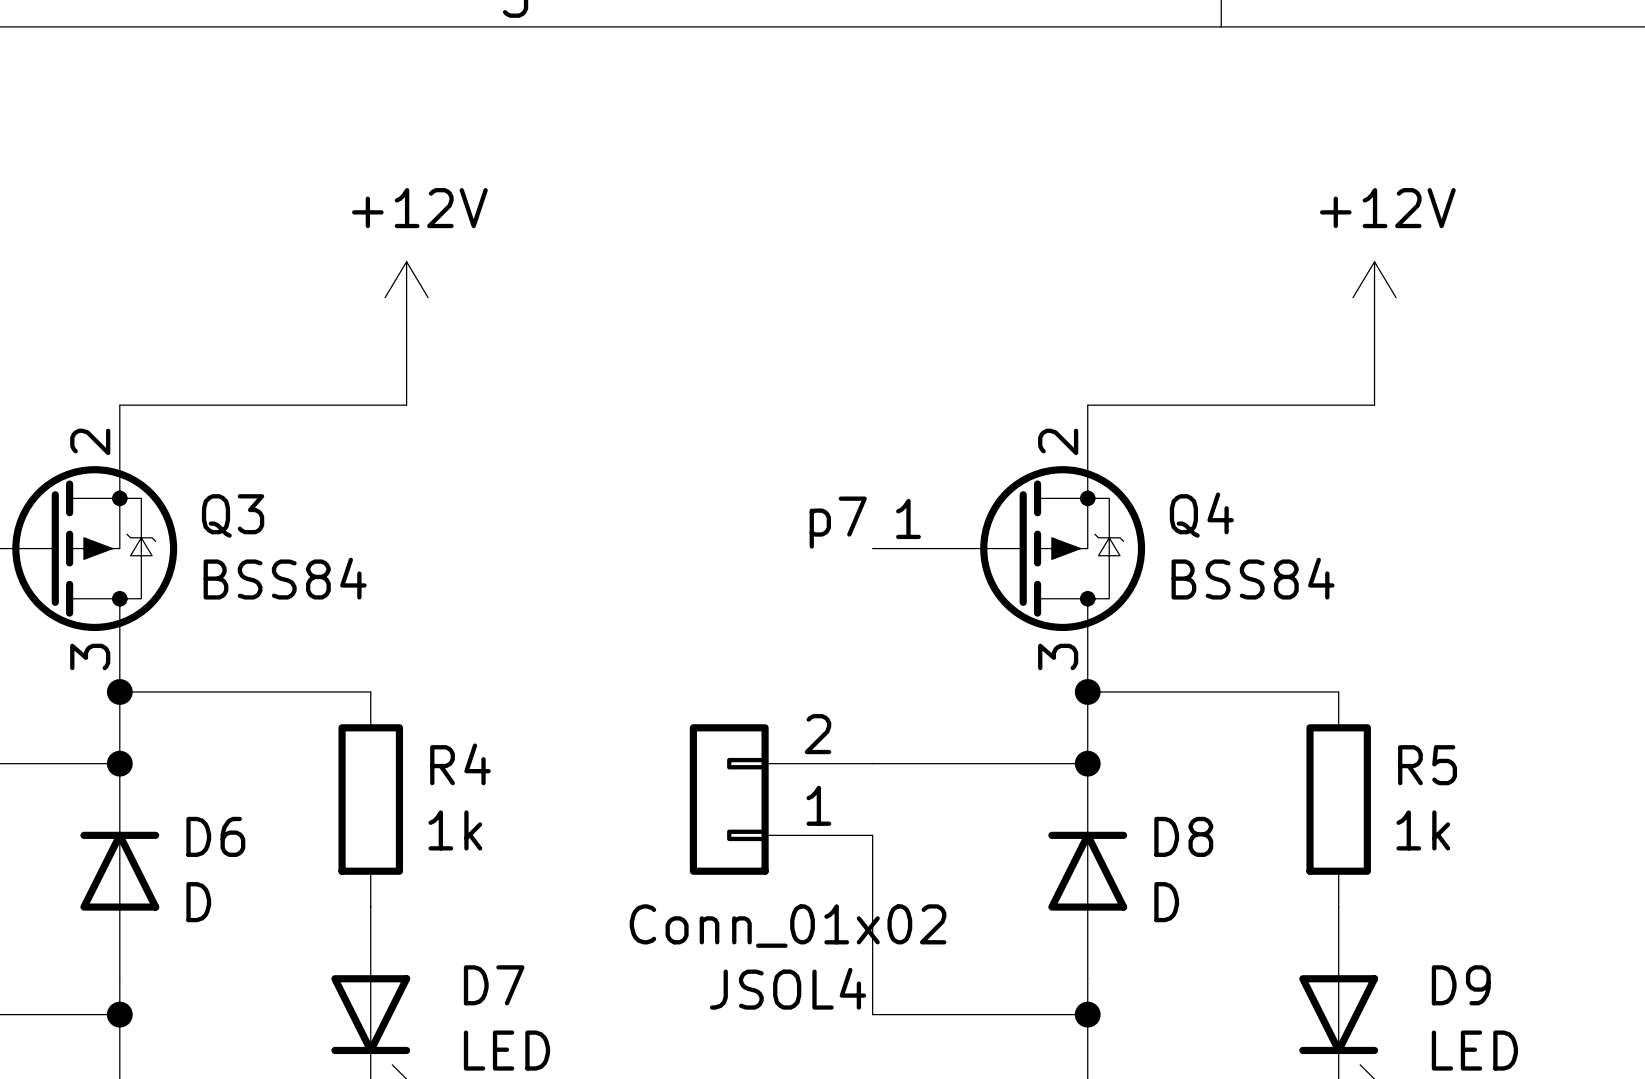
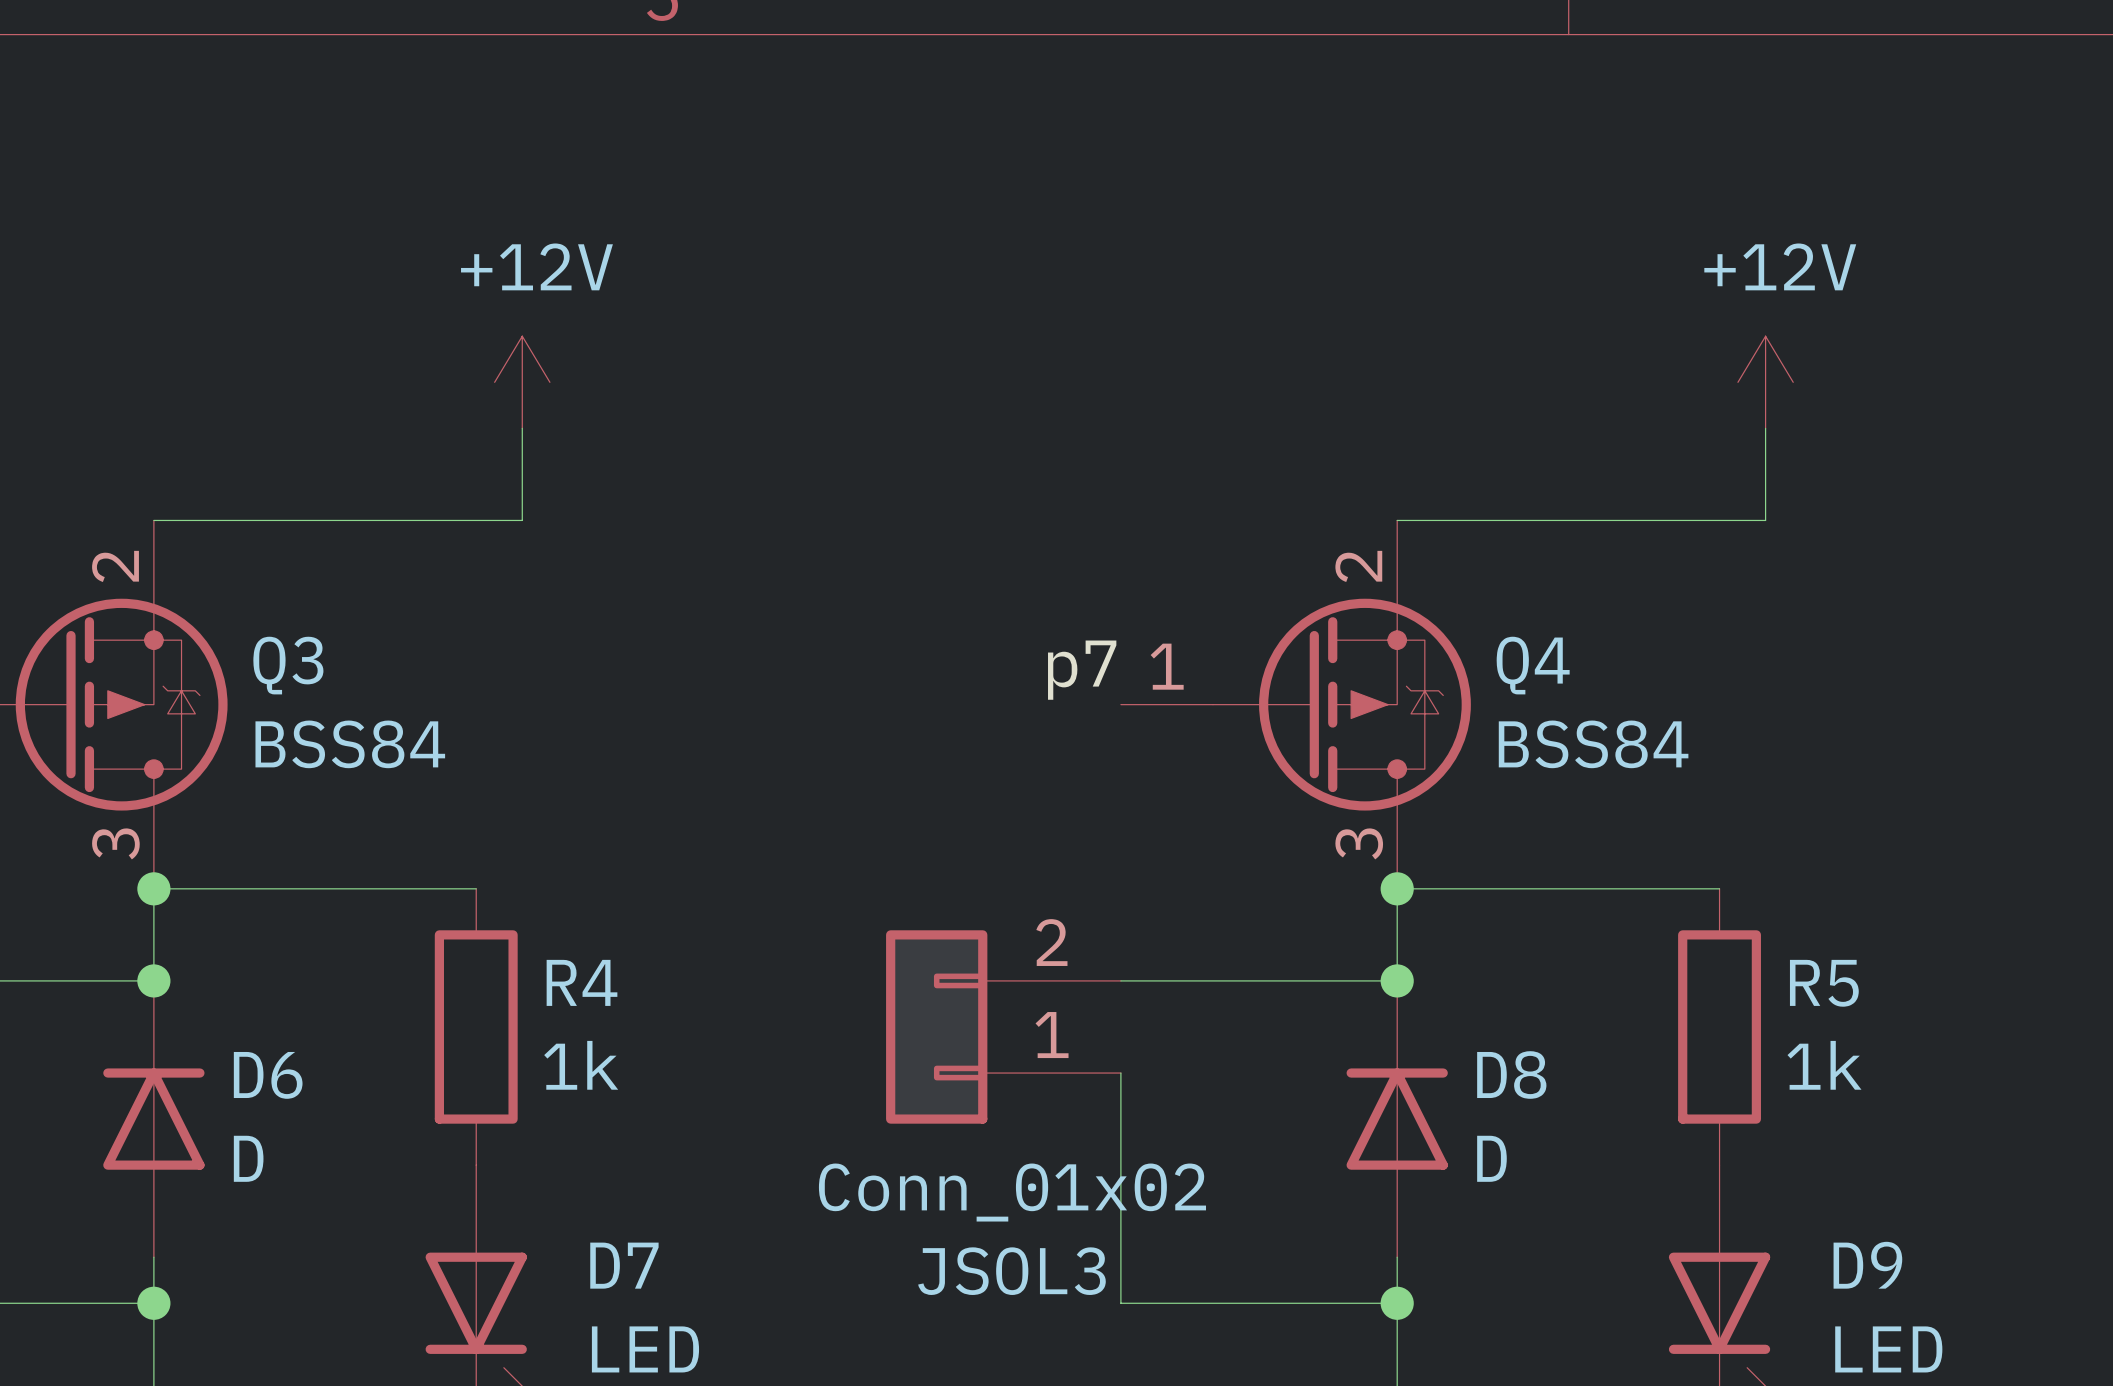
JSOL4 name: JSOL4 (788, 988) -> JSOL3 (1011, 1271)

